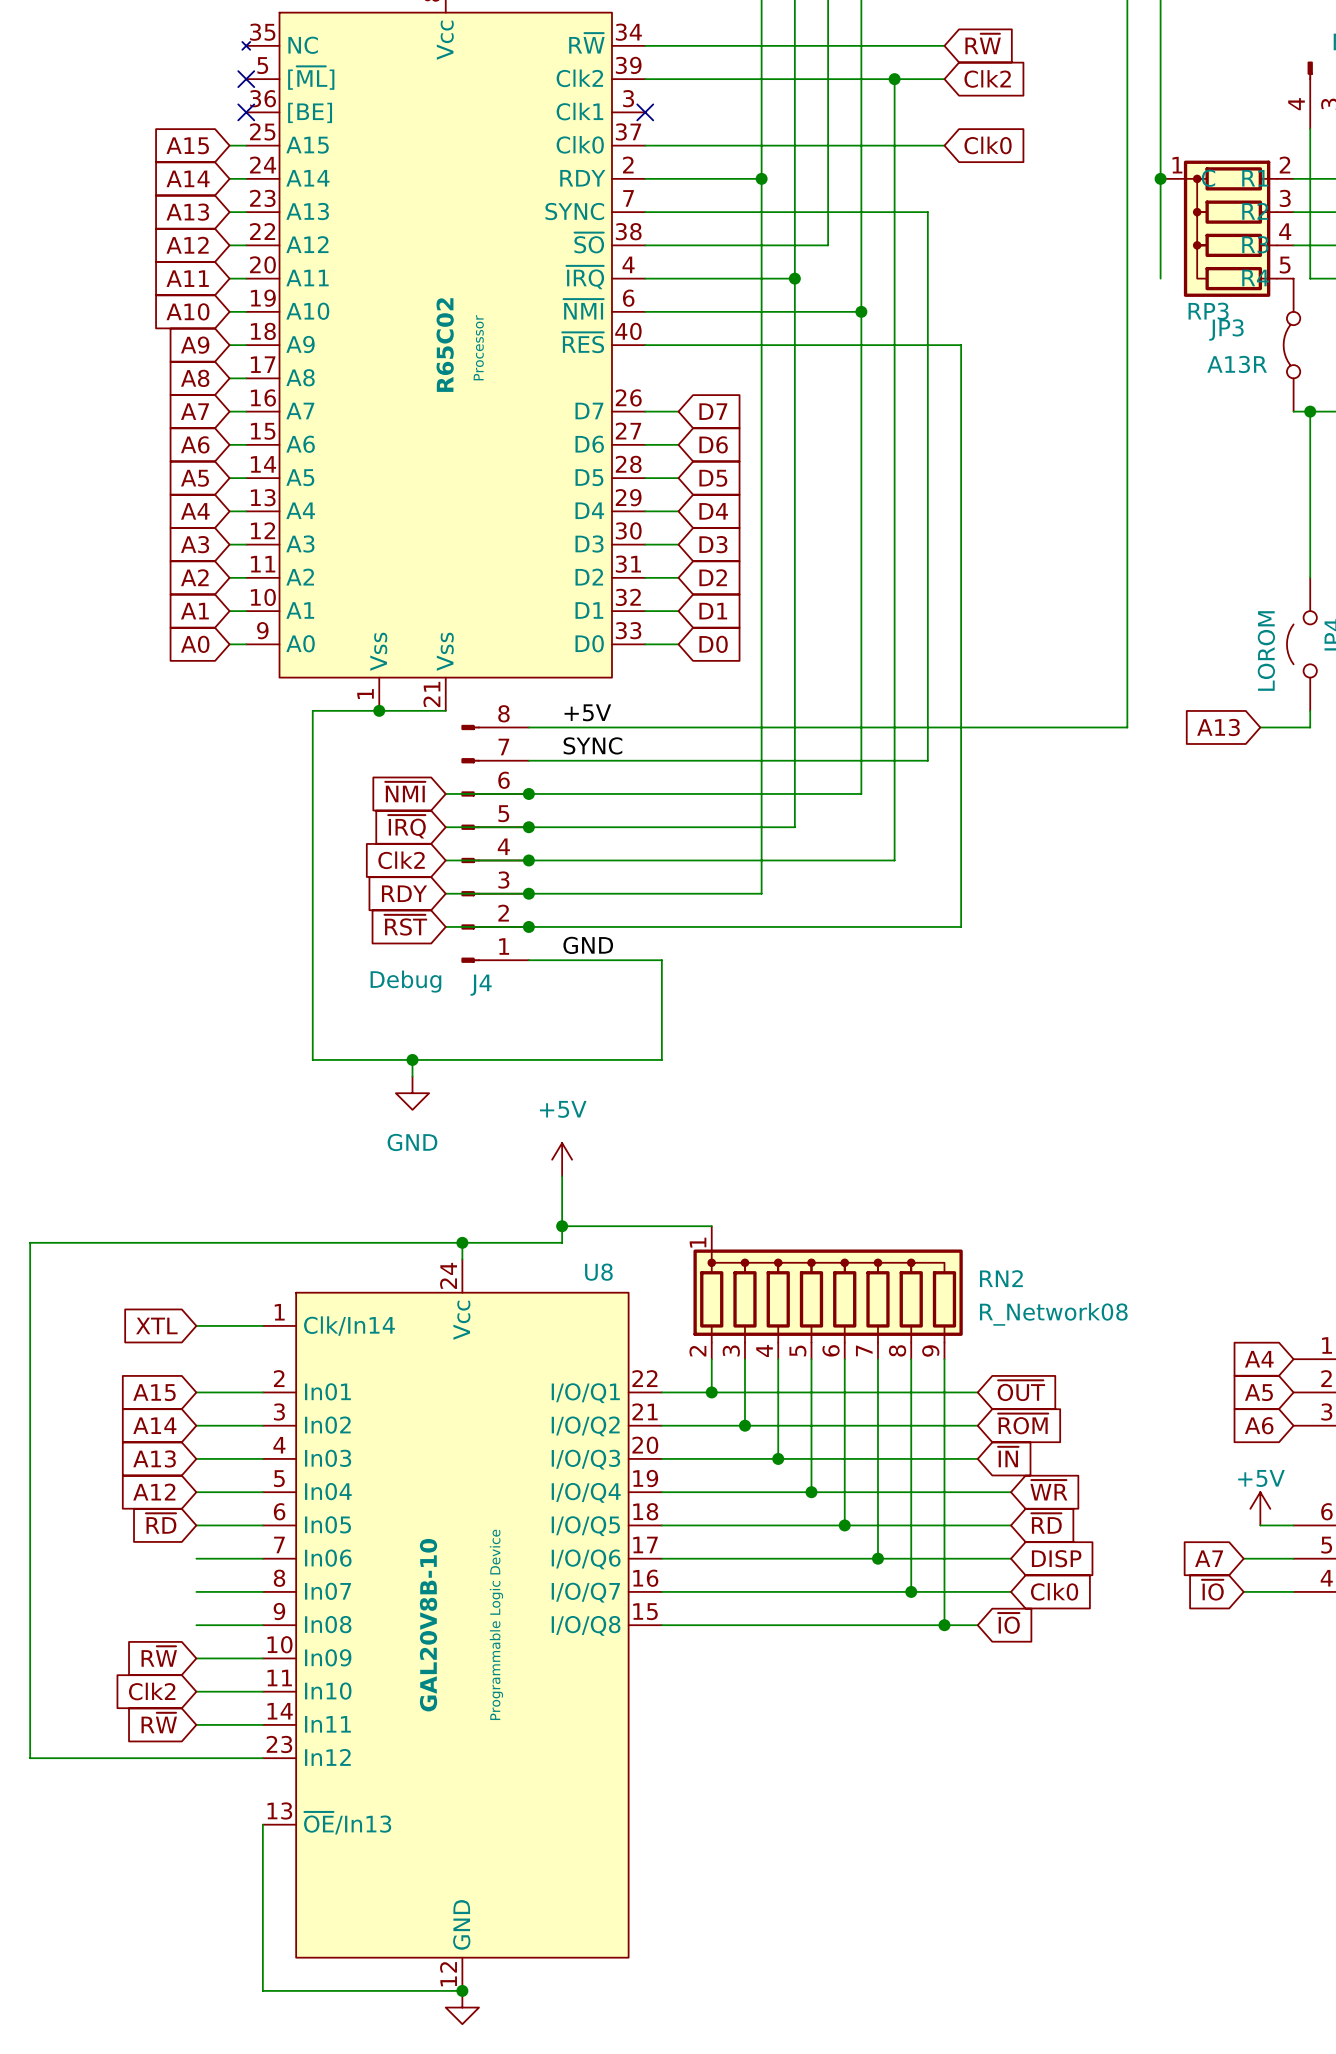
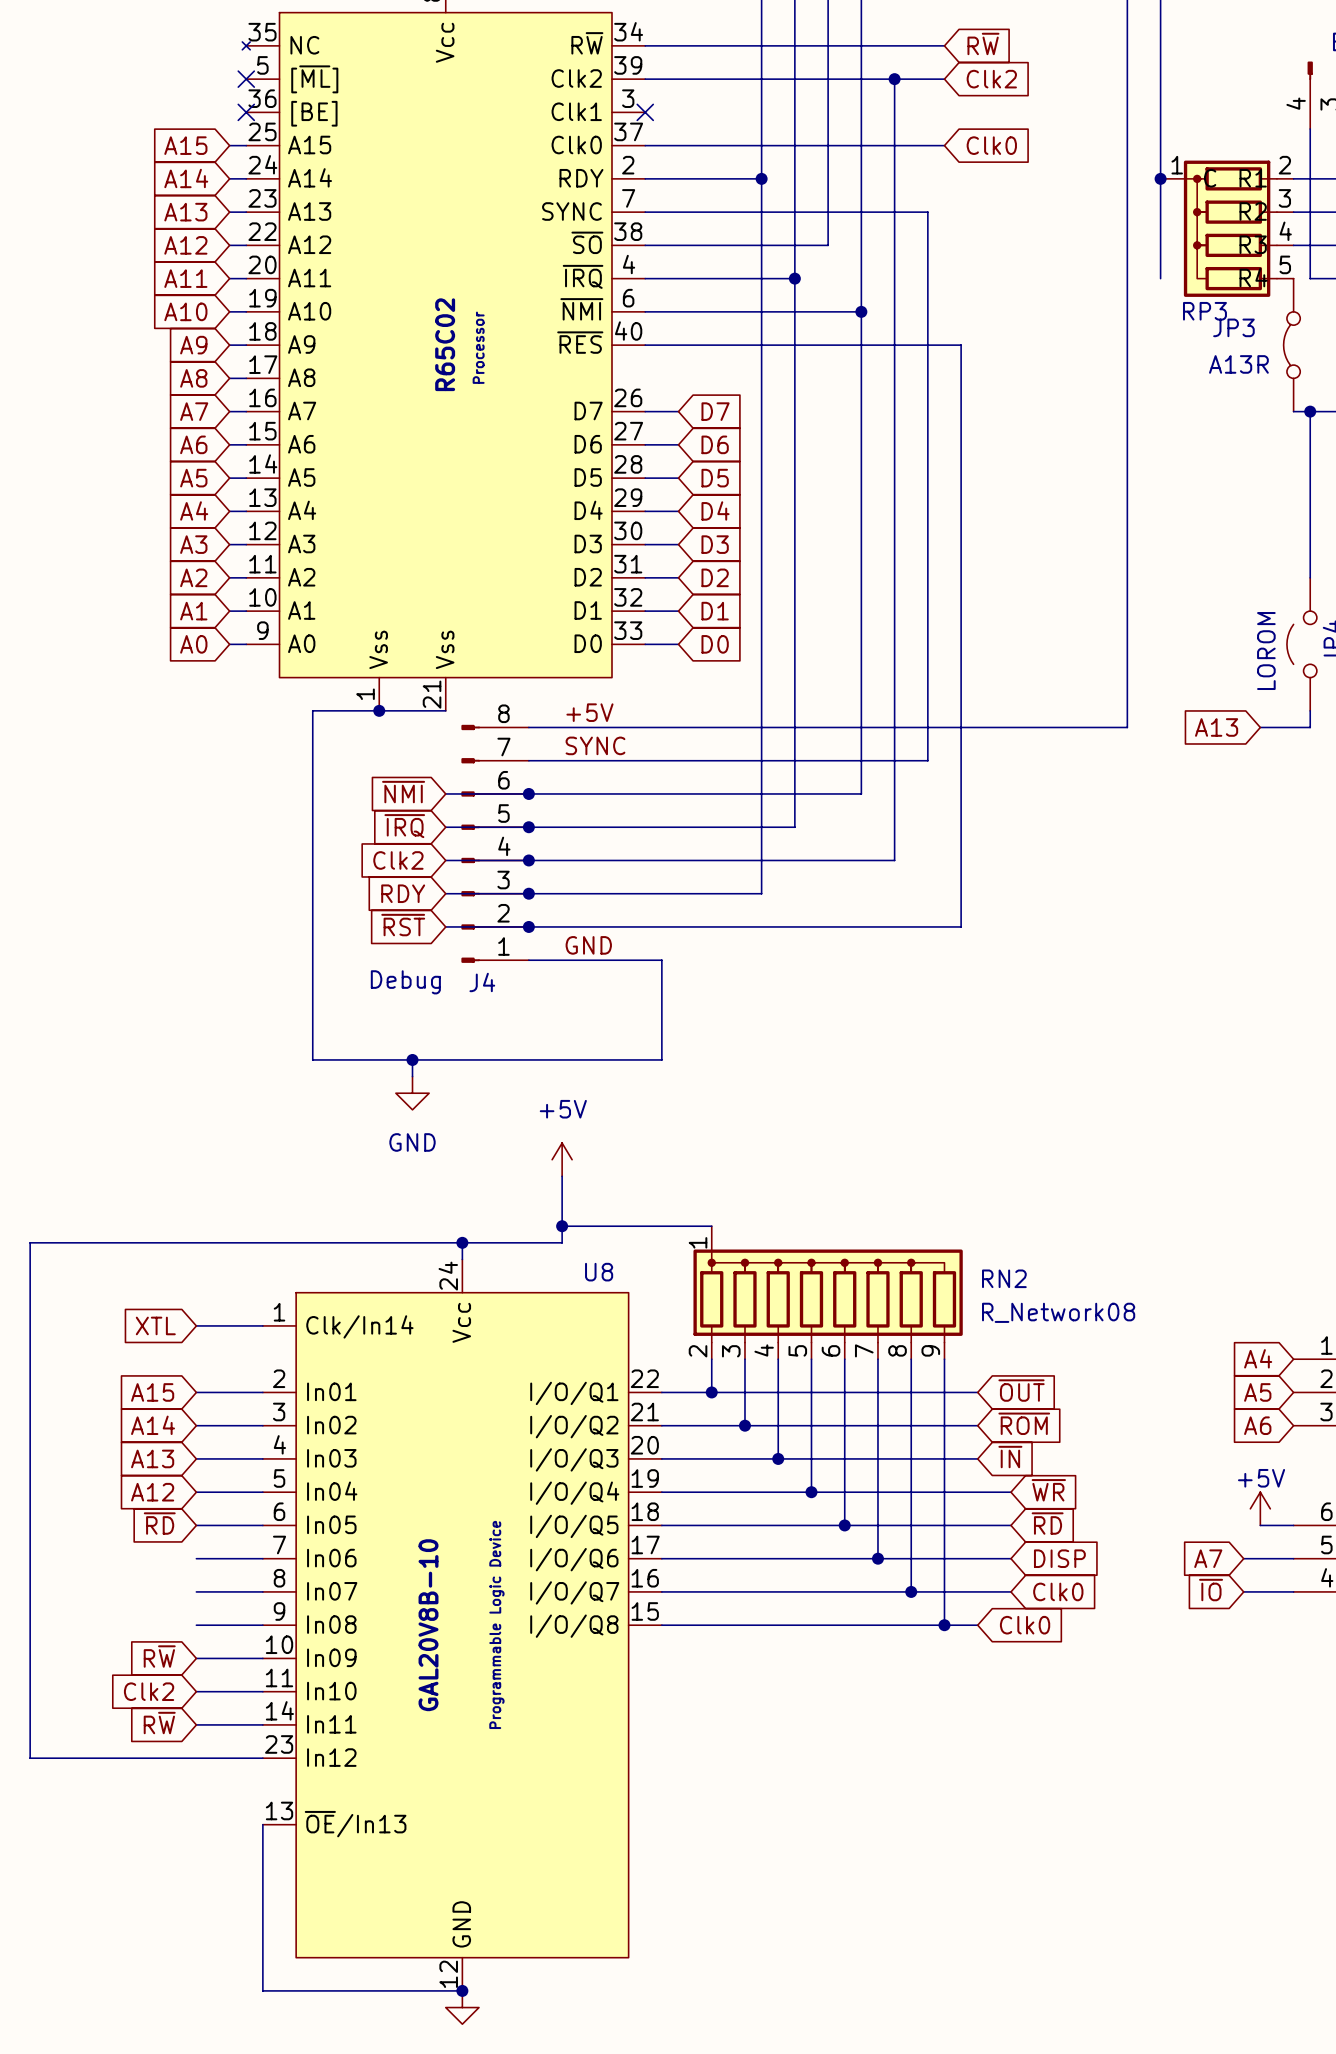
global label: ~{IO} (1008, 1623) -> Clk0 (1025, 1625)

